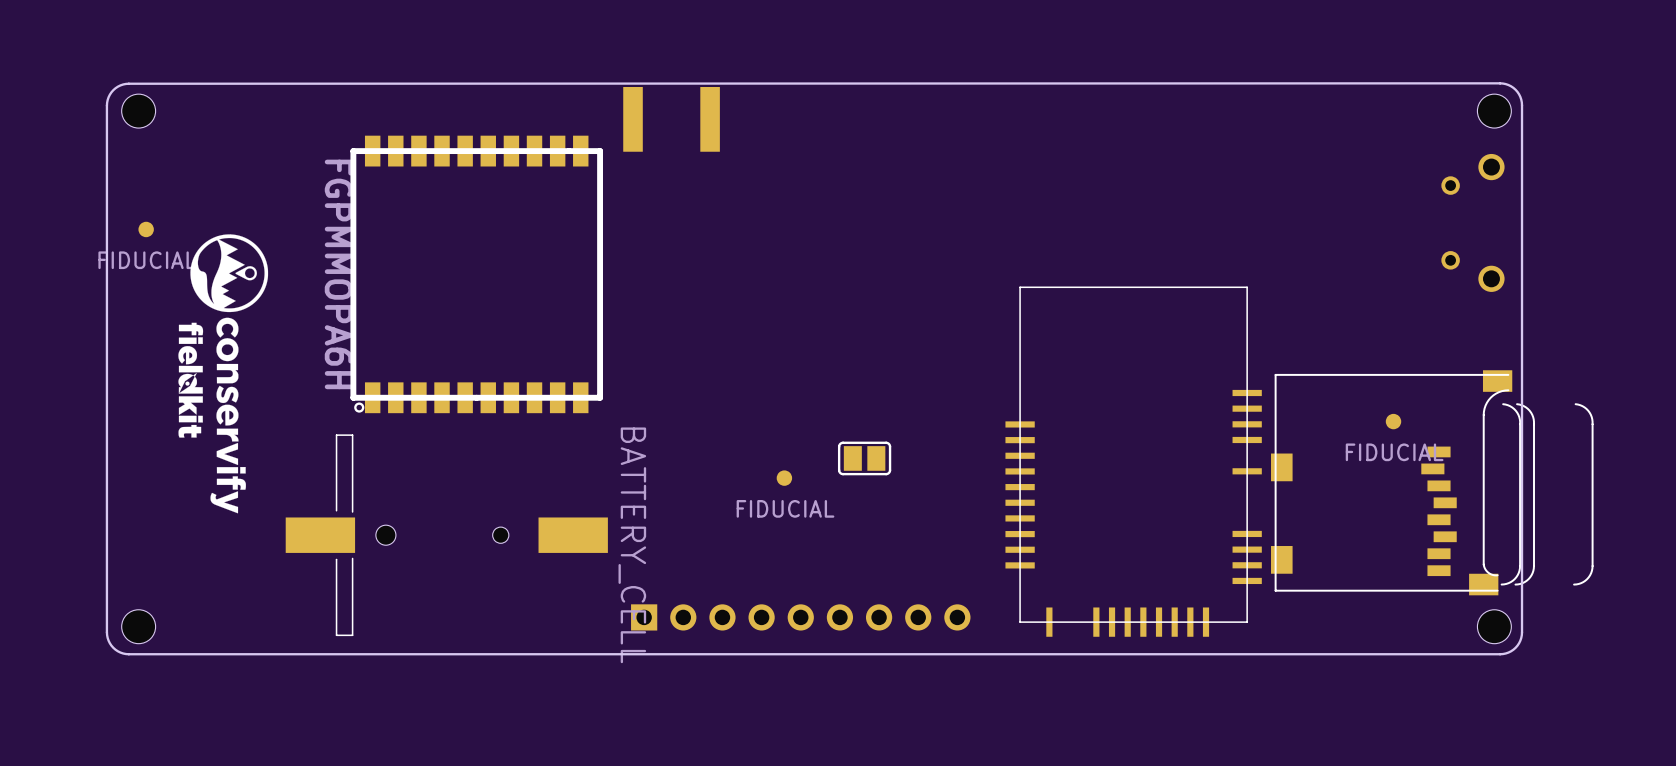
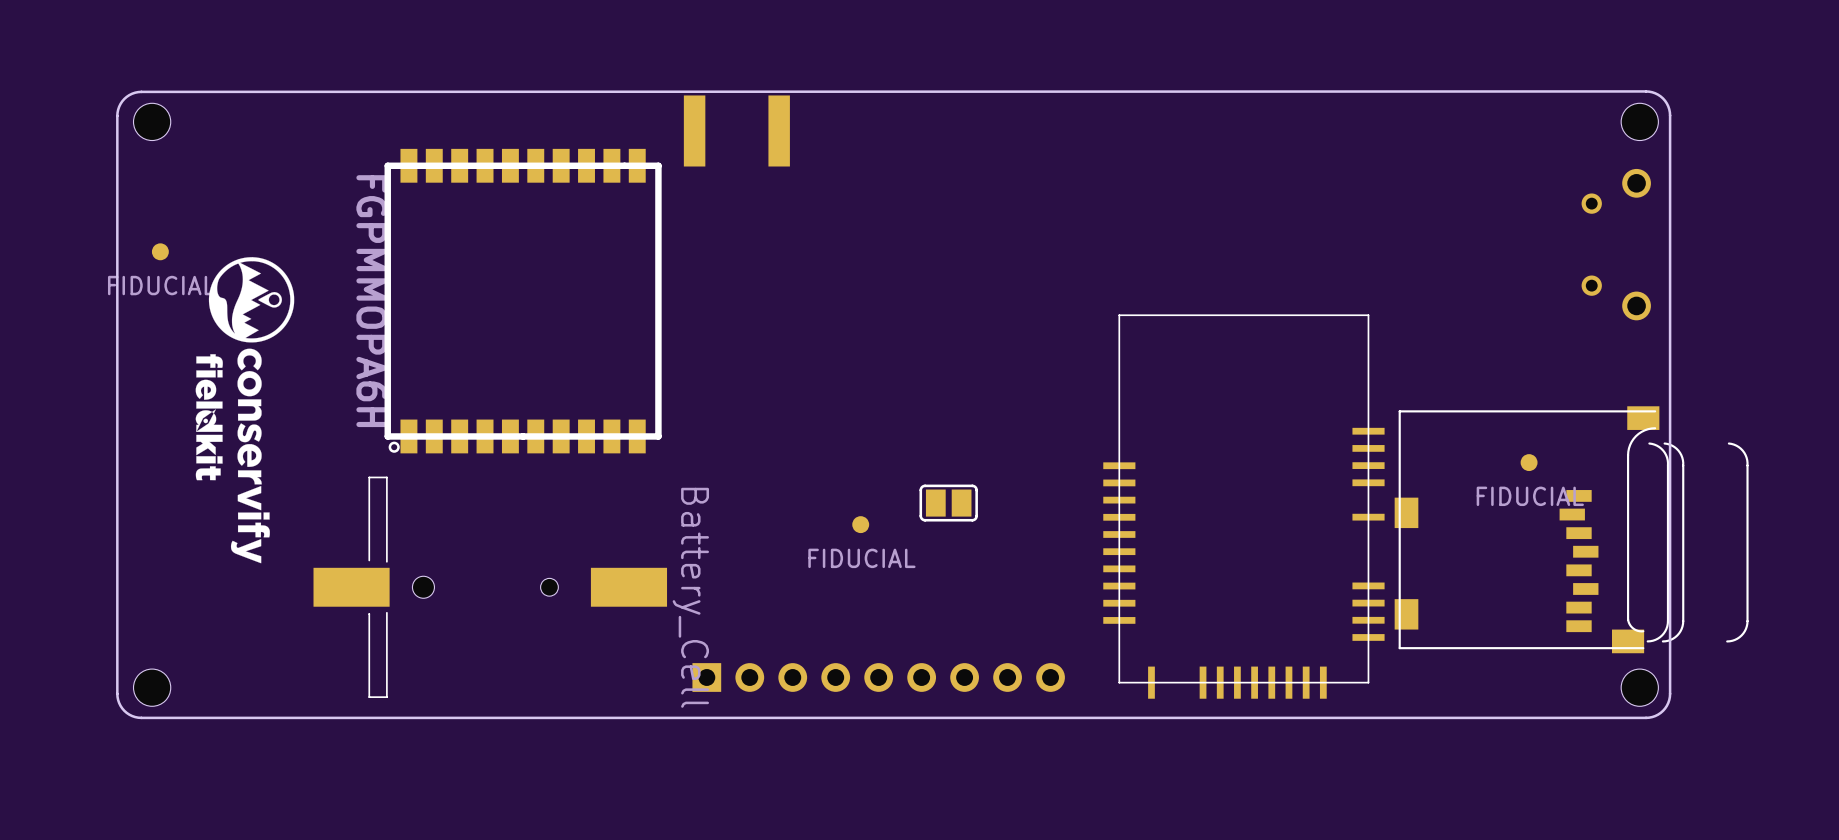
part value: BATTERY_CELL (632, 545) -> Battery_Cell (690, 597)

